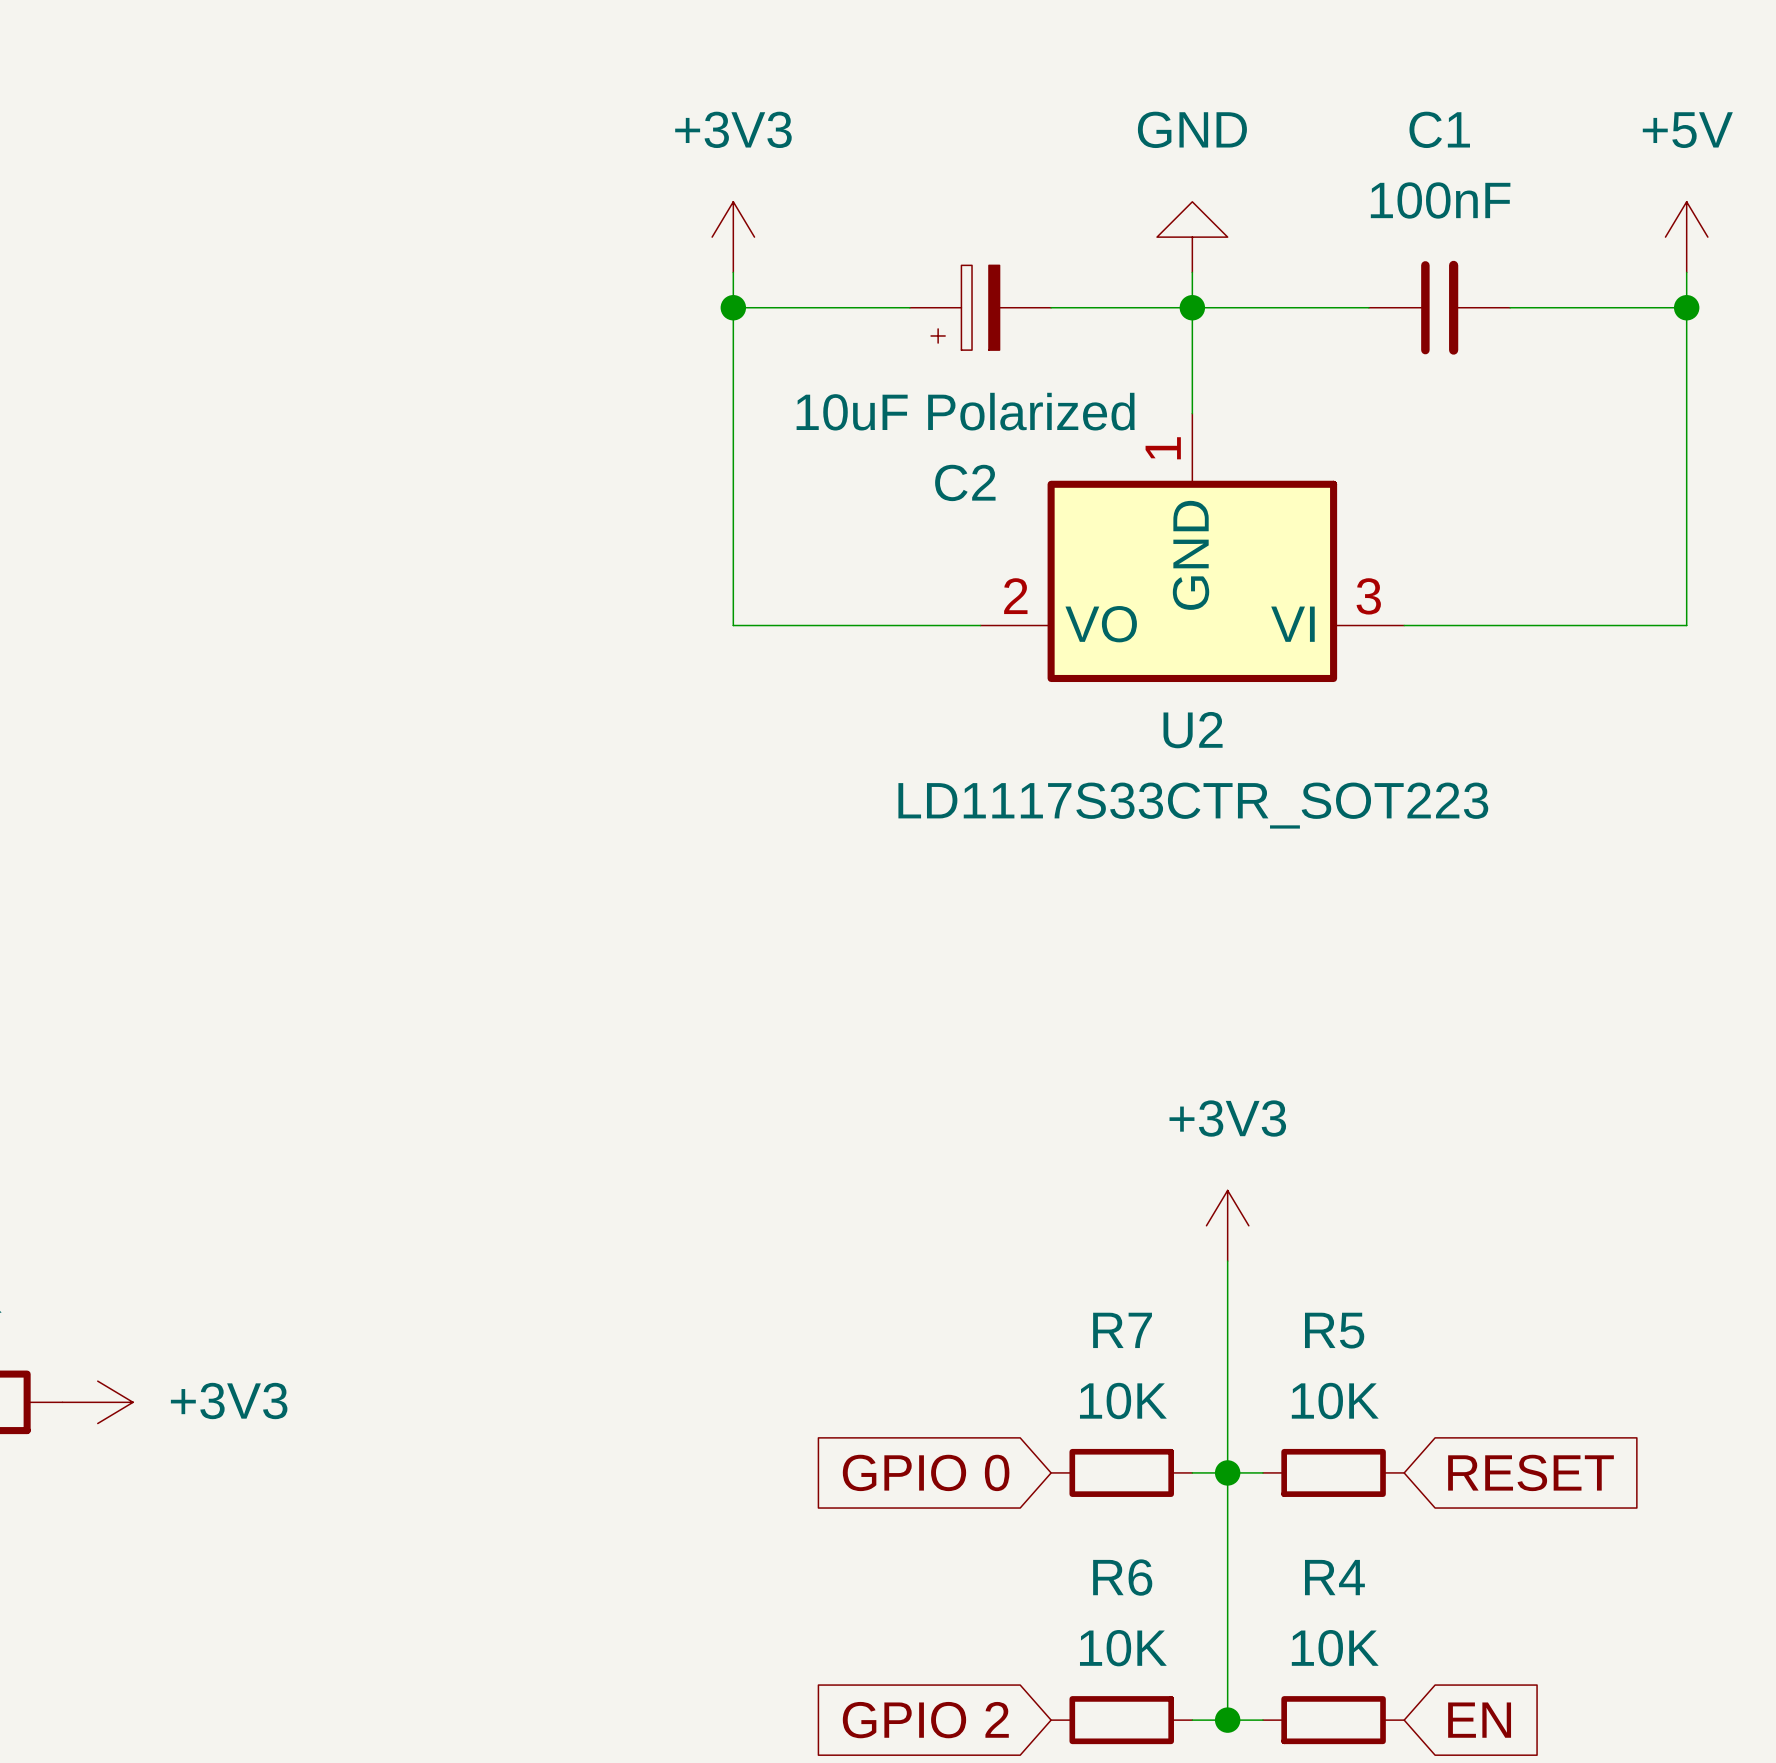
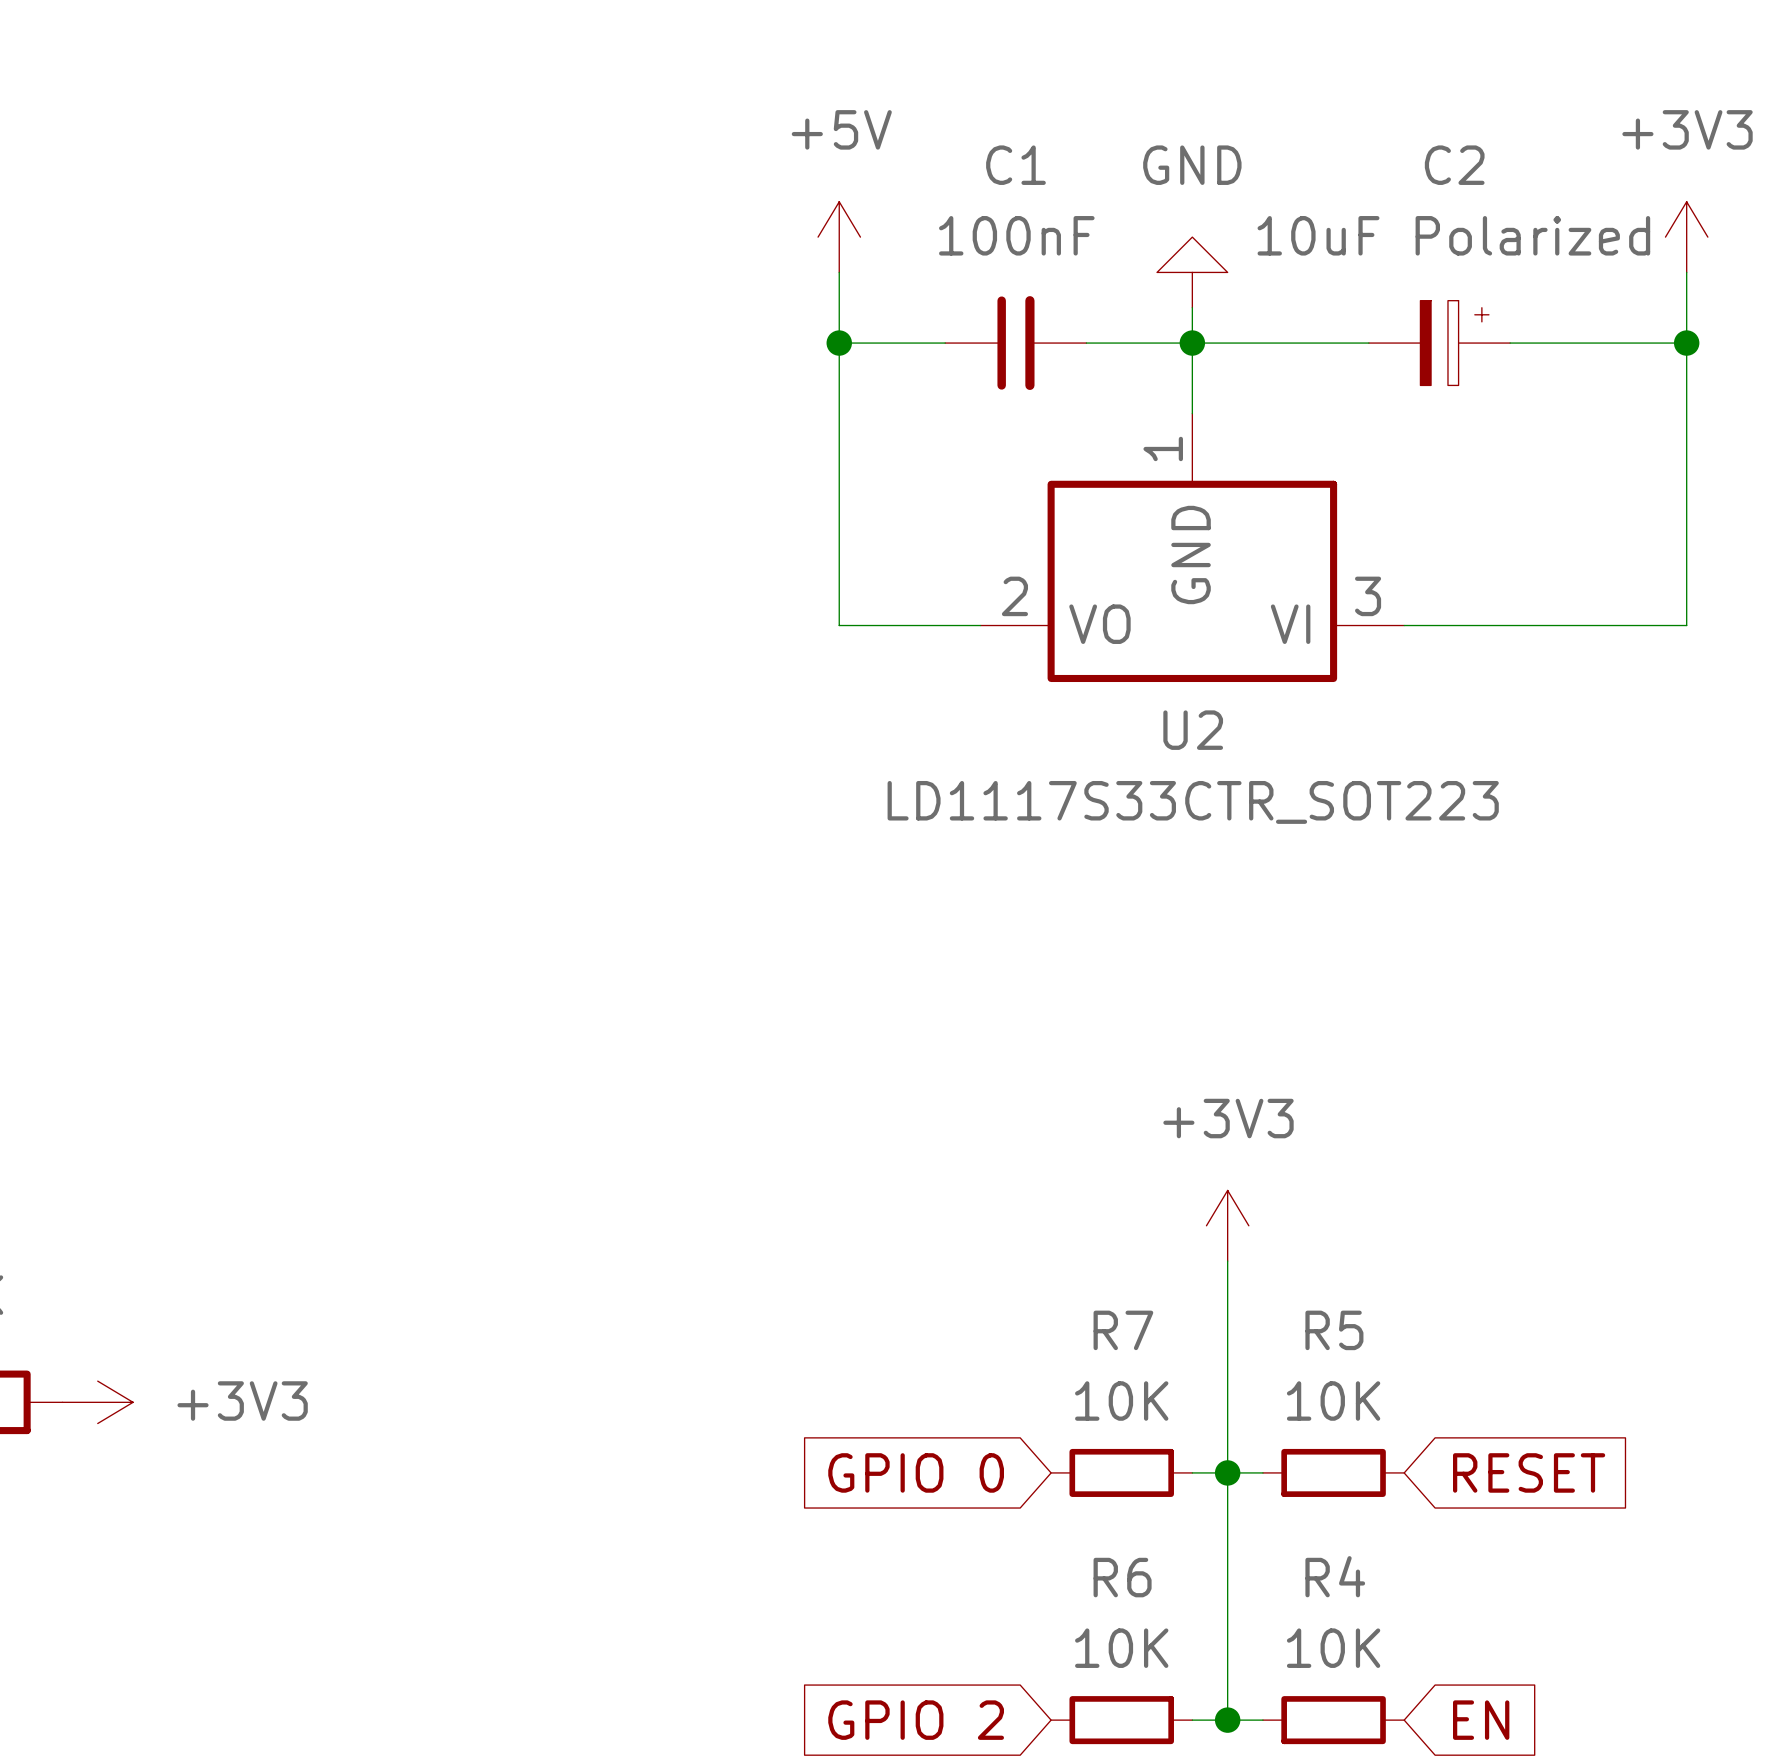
power symbol: +3V3 (733, 237) -> none
power symbol: none -> +5V (839, 237)
power symbol position: GND (1192, 237) -> GND (1192, 272)
power symbol: +5V (1686, 237) -> +3V3 (1686, 237)
wire: (733, 272) (733, 625) (839, 625) -> (839, 272) (839, 625)
wire: (733, 307) (909, 307) -> none
junction position: (733, 307) -> (839, 343)
C2 rotation: 0° (965, 307) -> 180° (1454, 343)
C2 position: (980, 307) -> (1439, 343)
wire: (1051, 307) (1368, 307) -> none
junction position: (1192, 307) -> (1192, 343)
C1 position: (1439, 307) -> (1015, 343)
wire: (1510, 307) (1686, 307) -> (1510, 343) (1686, 343)
junction position: (1686, 307) -> (1686, 343)
wire: none -> (839, 343) (945, 343)
wire: none -> (1086, 343) (1368, 343)

